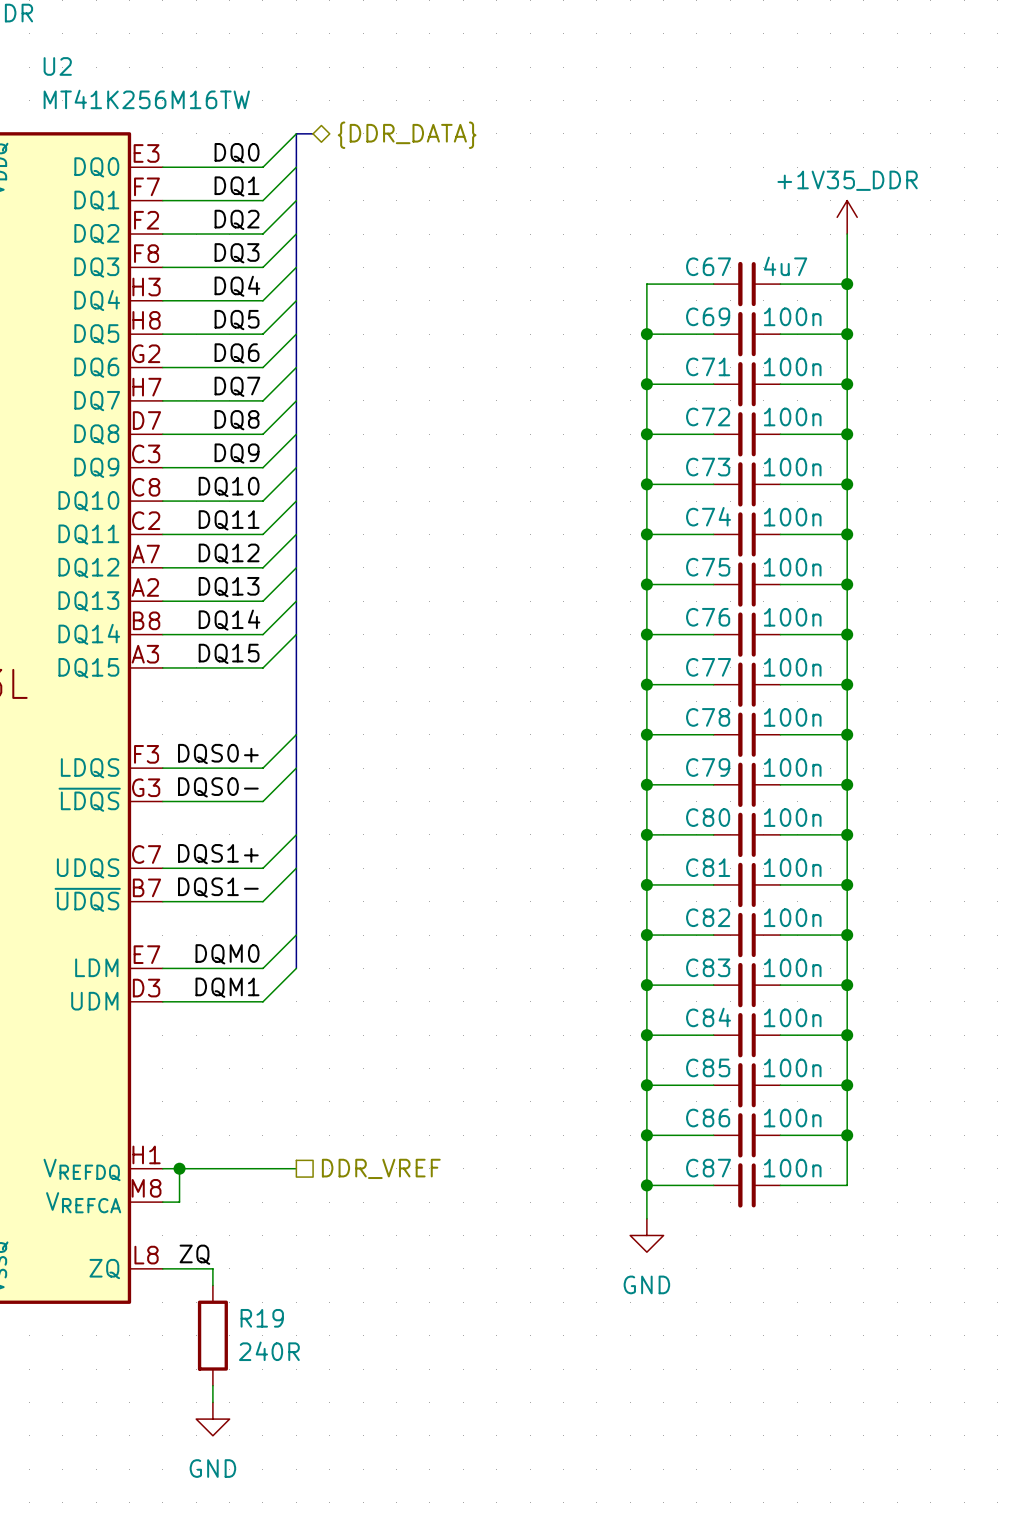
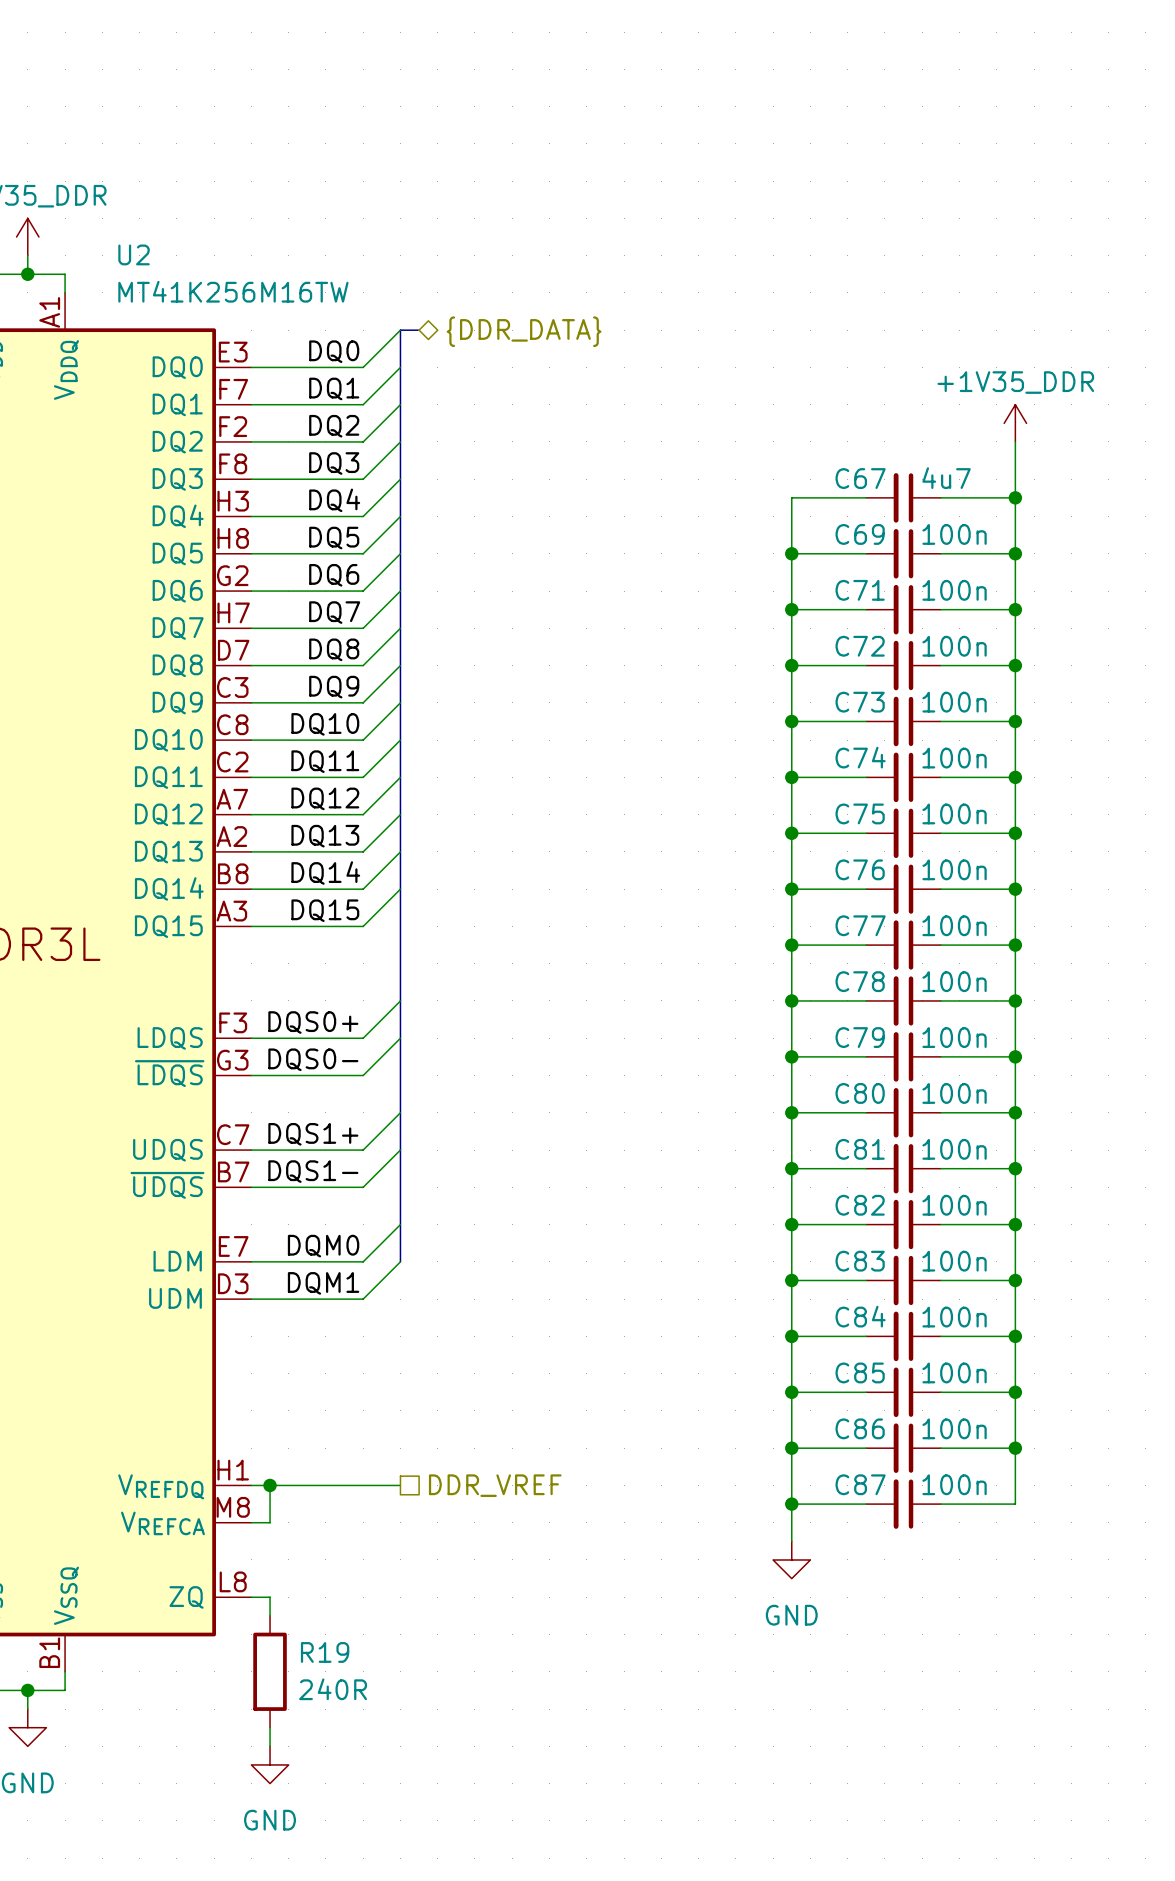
label: ZQ (194, 1254) -> none
wire: (179, 1268) (212, 1268) (212, 1285) -> (270, 1597) (270, 1615)
R19 position: (212, 1335) -> (270, 1671)
wire: (212, 1385) (212, 1402) -> (270, 1727) (270, 1746)
power symbol position: GND (212, 1419) -> GND (270, 1764)

